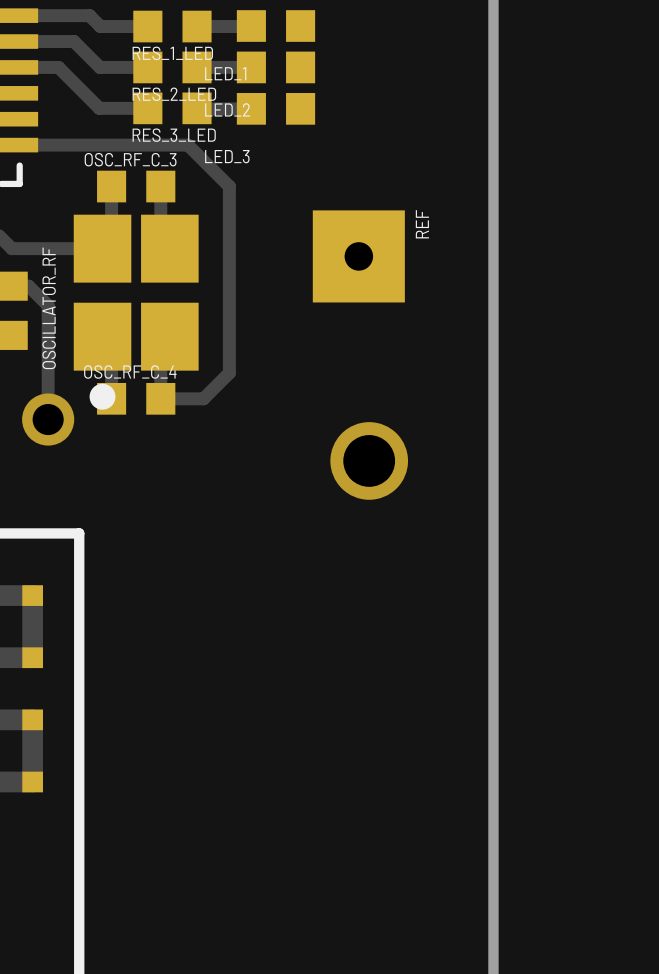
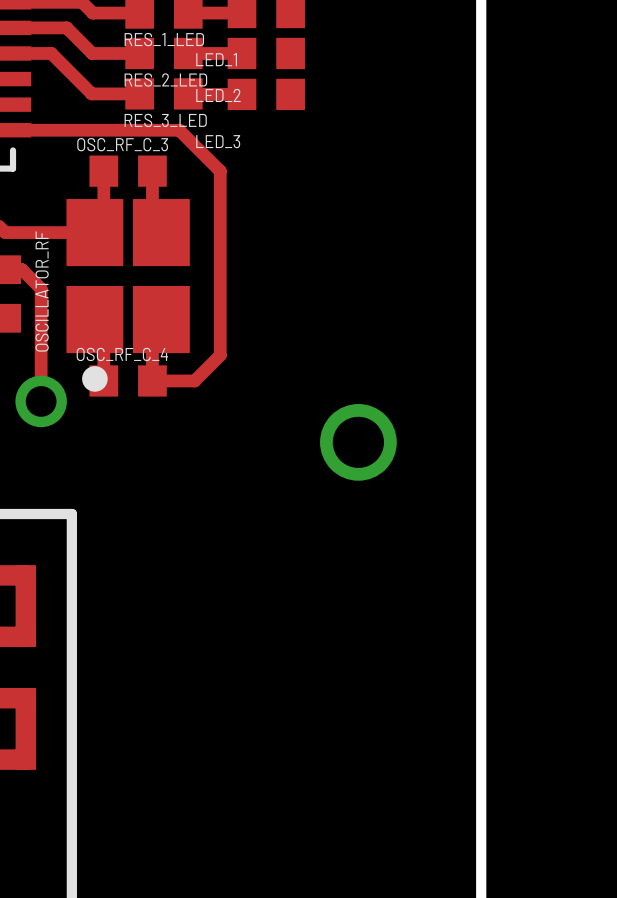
REF: (358, 256) -> none

